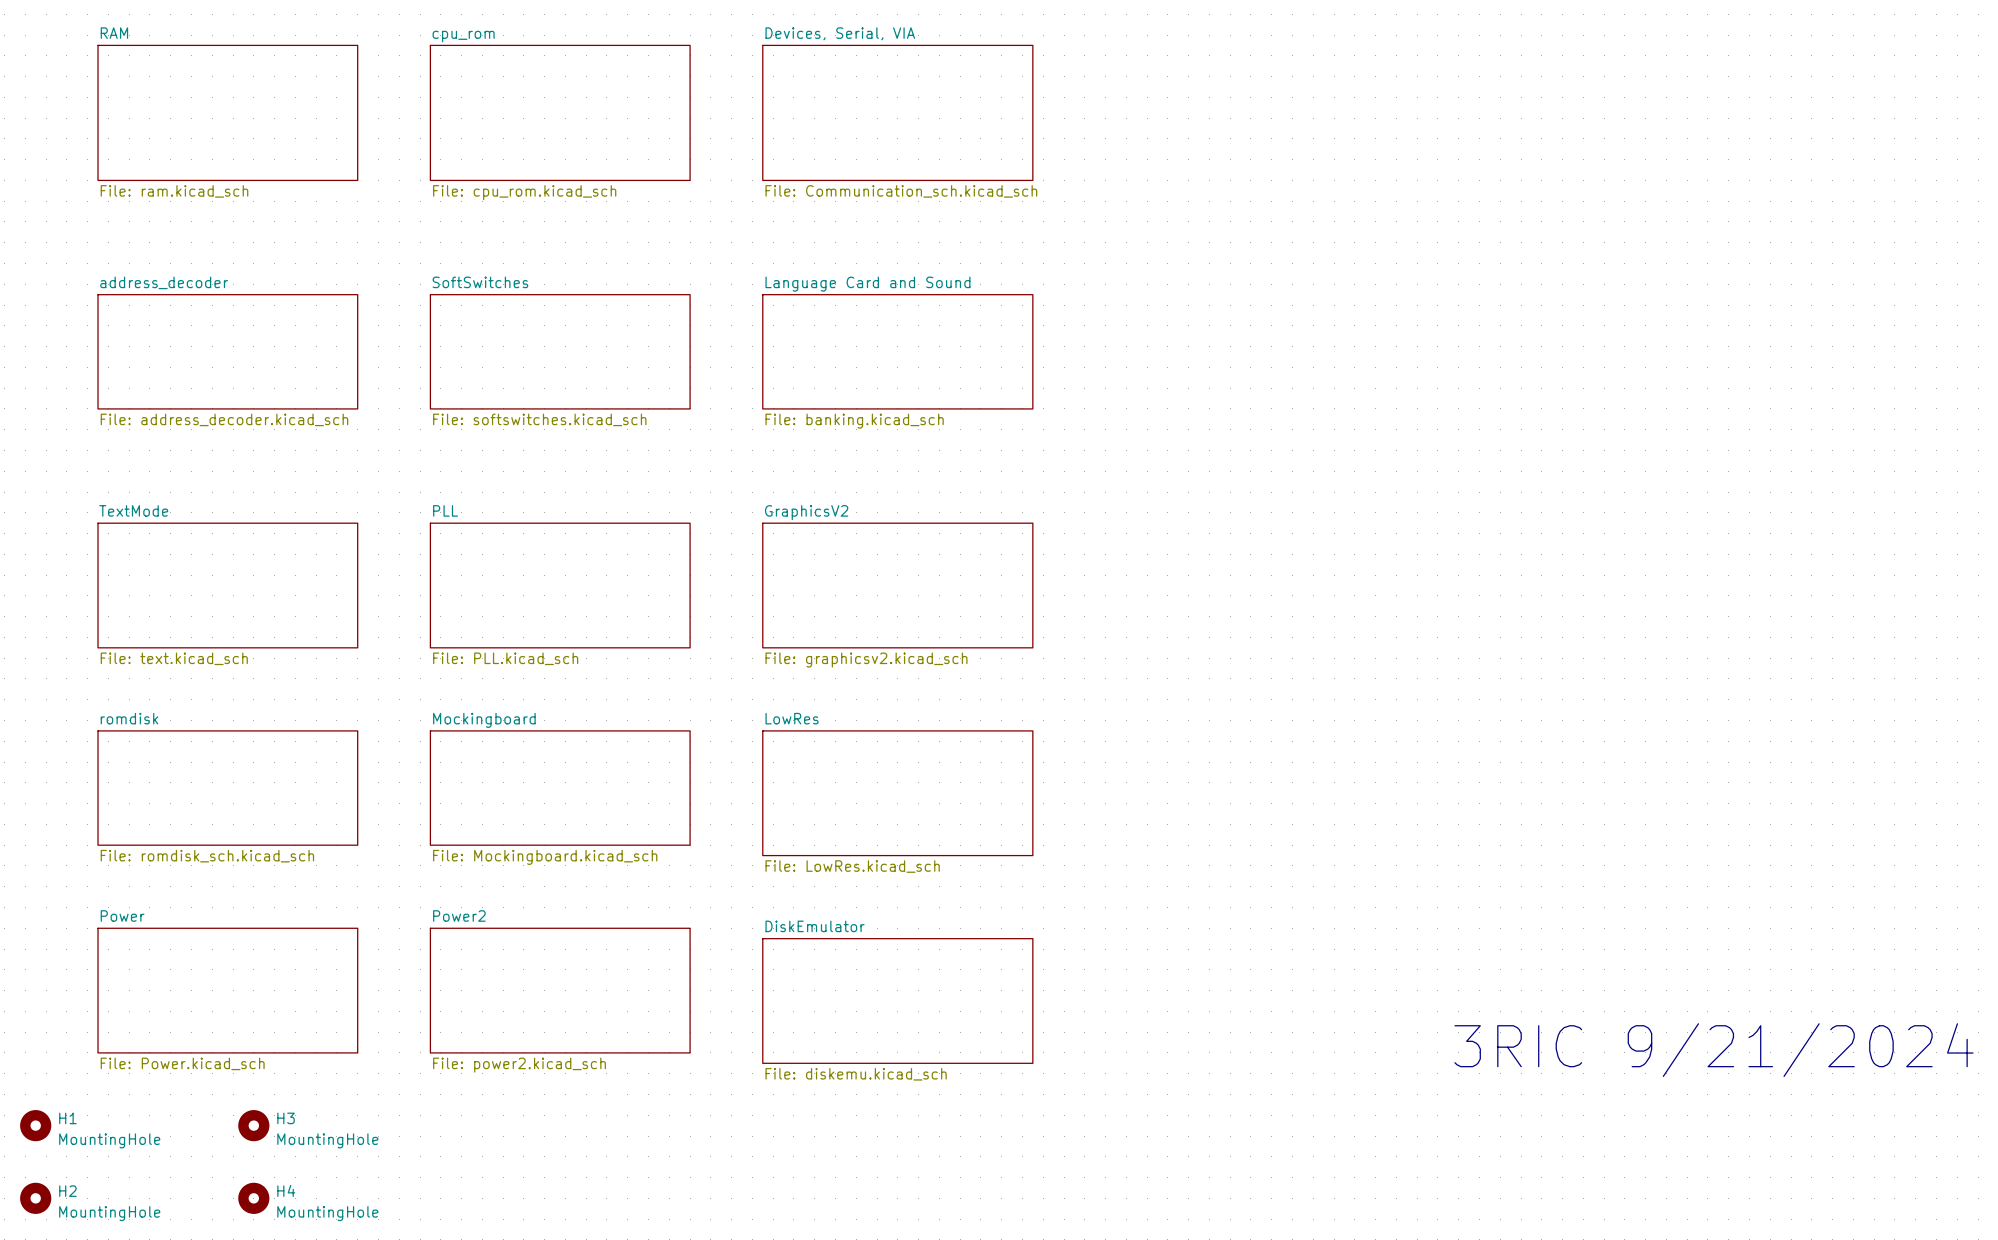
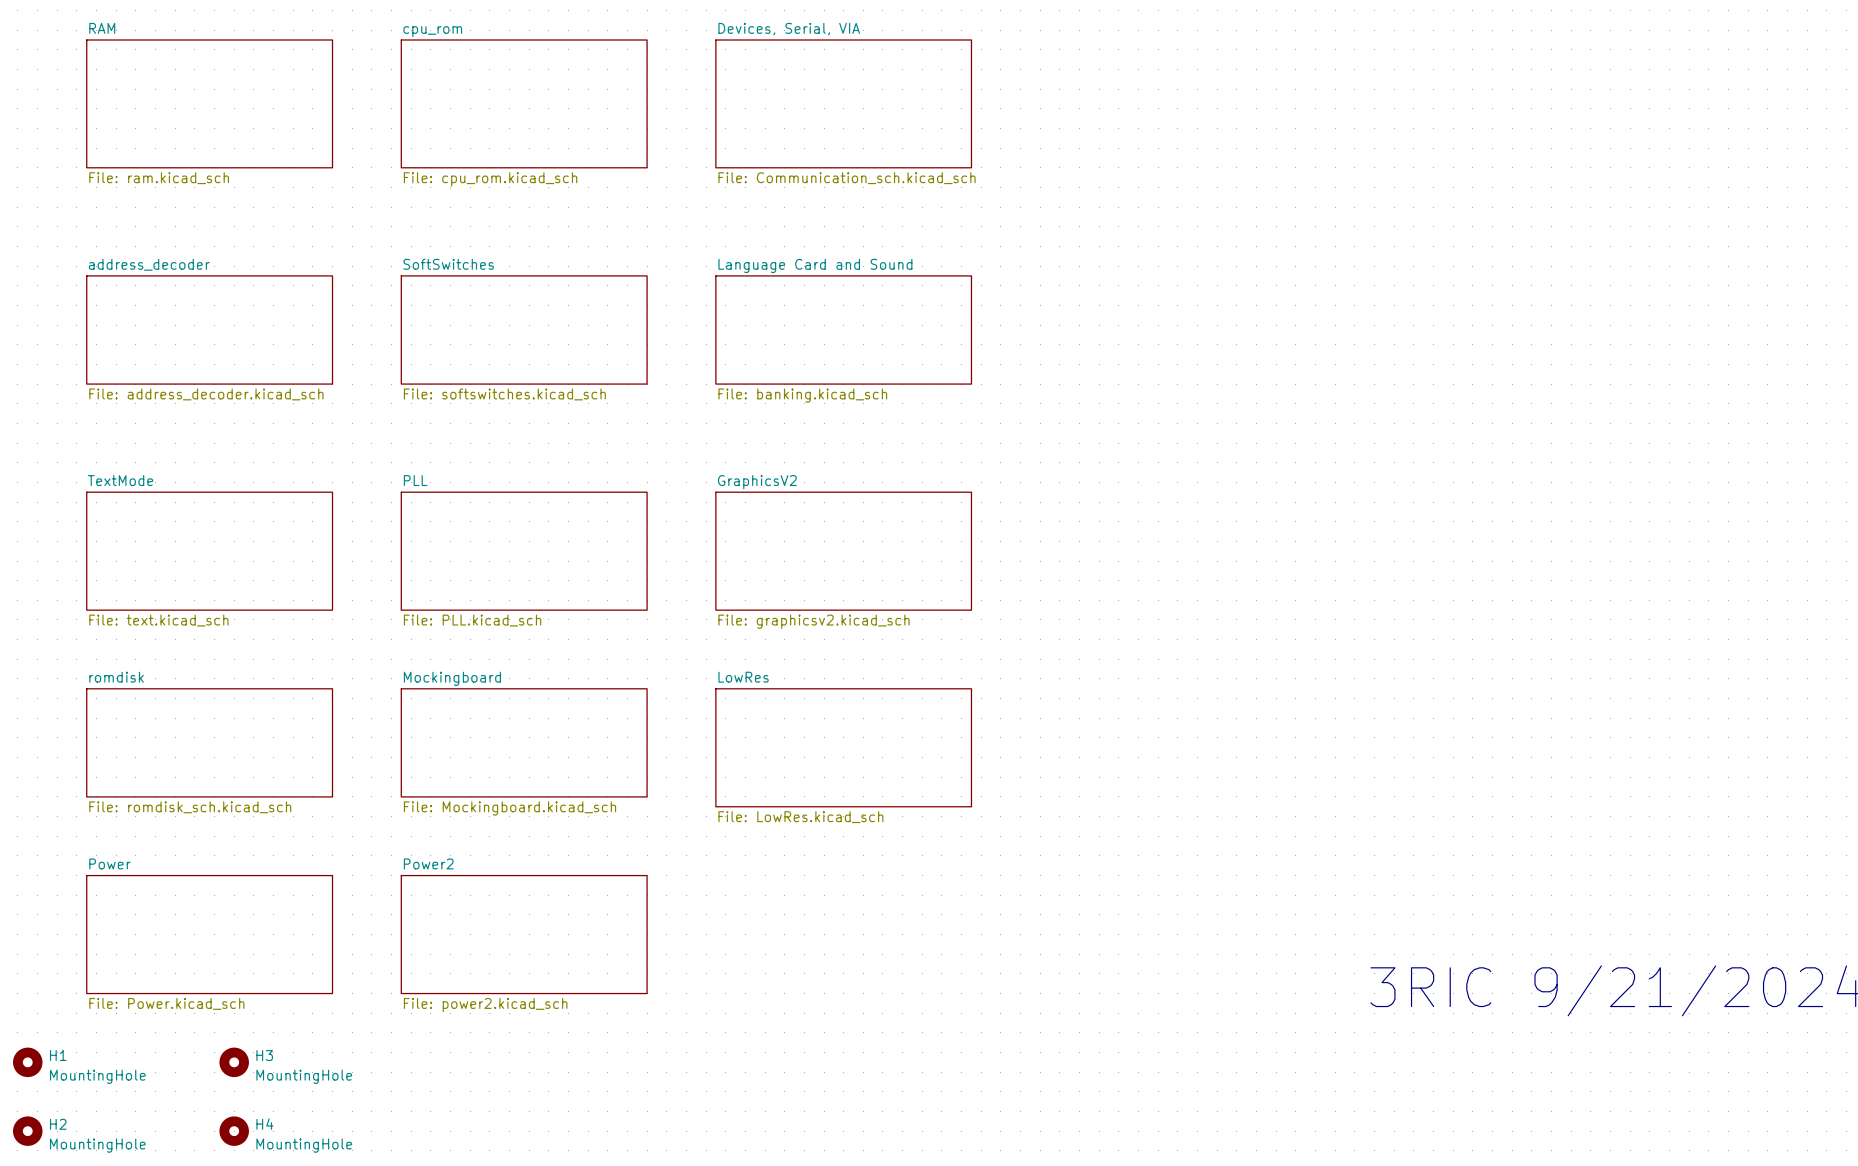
sheet DiskEmulator: File: diskemu.kicad_sch (897, 1000) -> none

